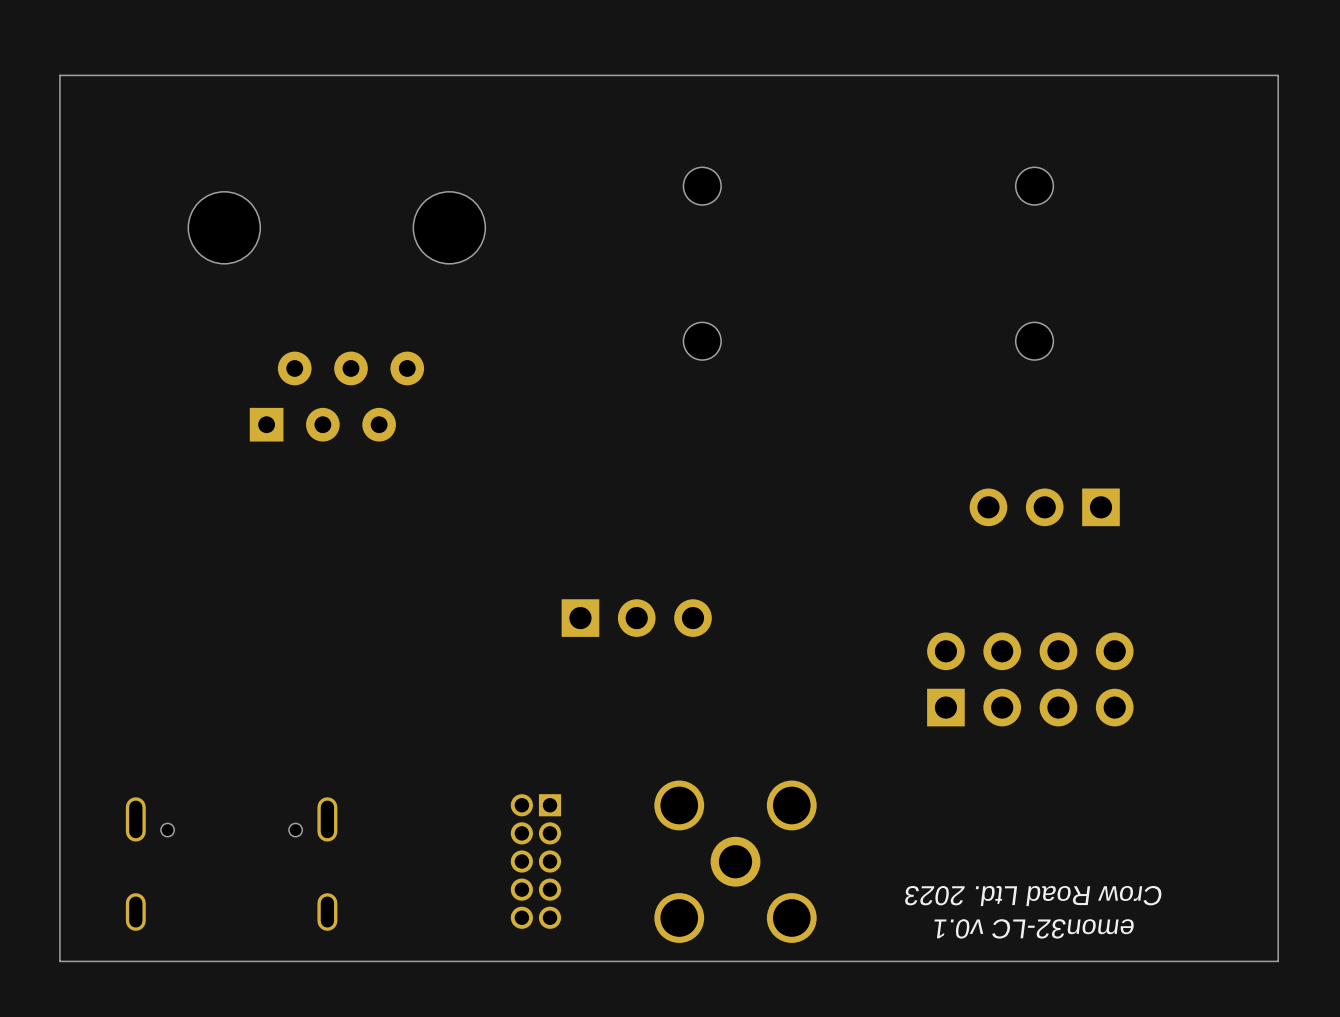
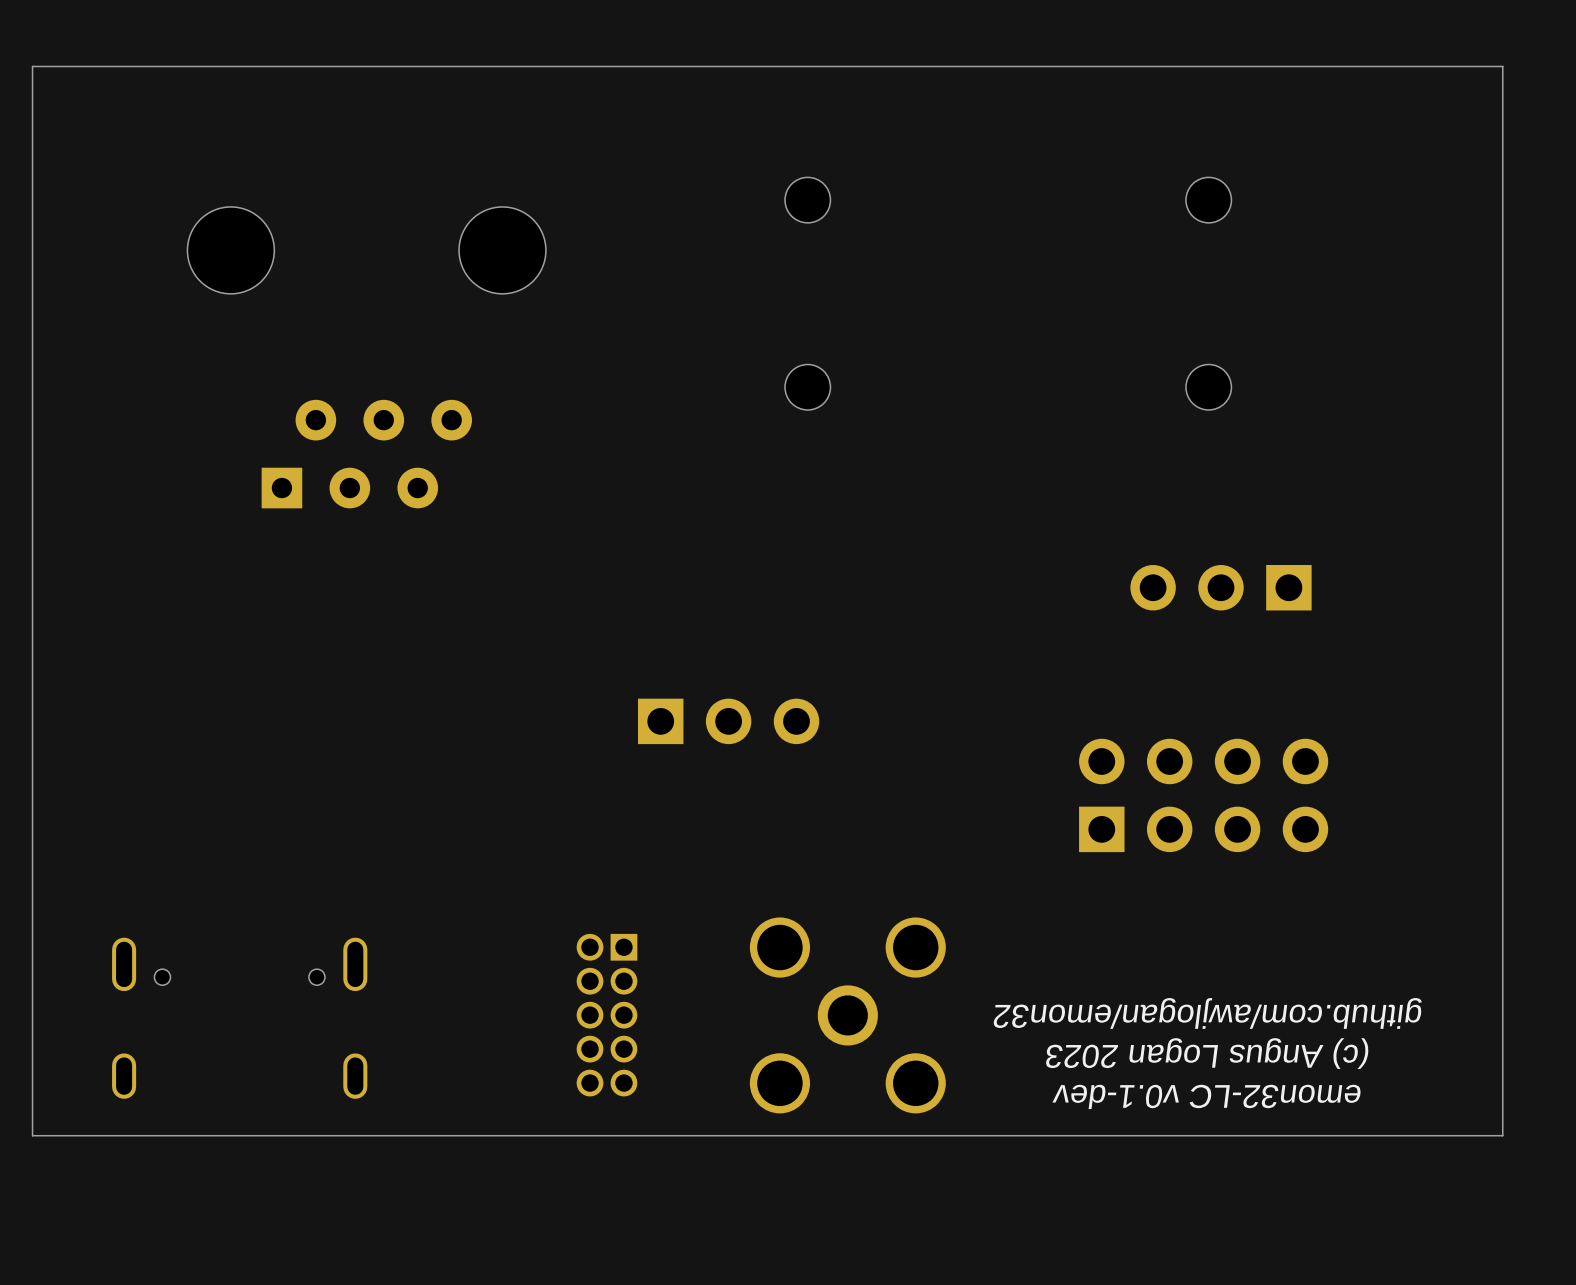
text: none -> github.com/awjlogan/emon32 (1207, 1013)
text: Crow Road Ltd. 2023 (1033, 896) -> (c) Angus Logan 2023 (1207, 1053)
text: emon32-LC v0.1 (1034, 928) -> emon32-LC v0.1-dev (1206, 1096)

